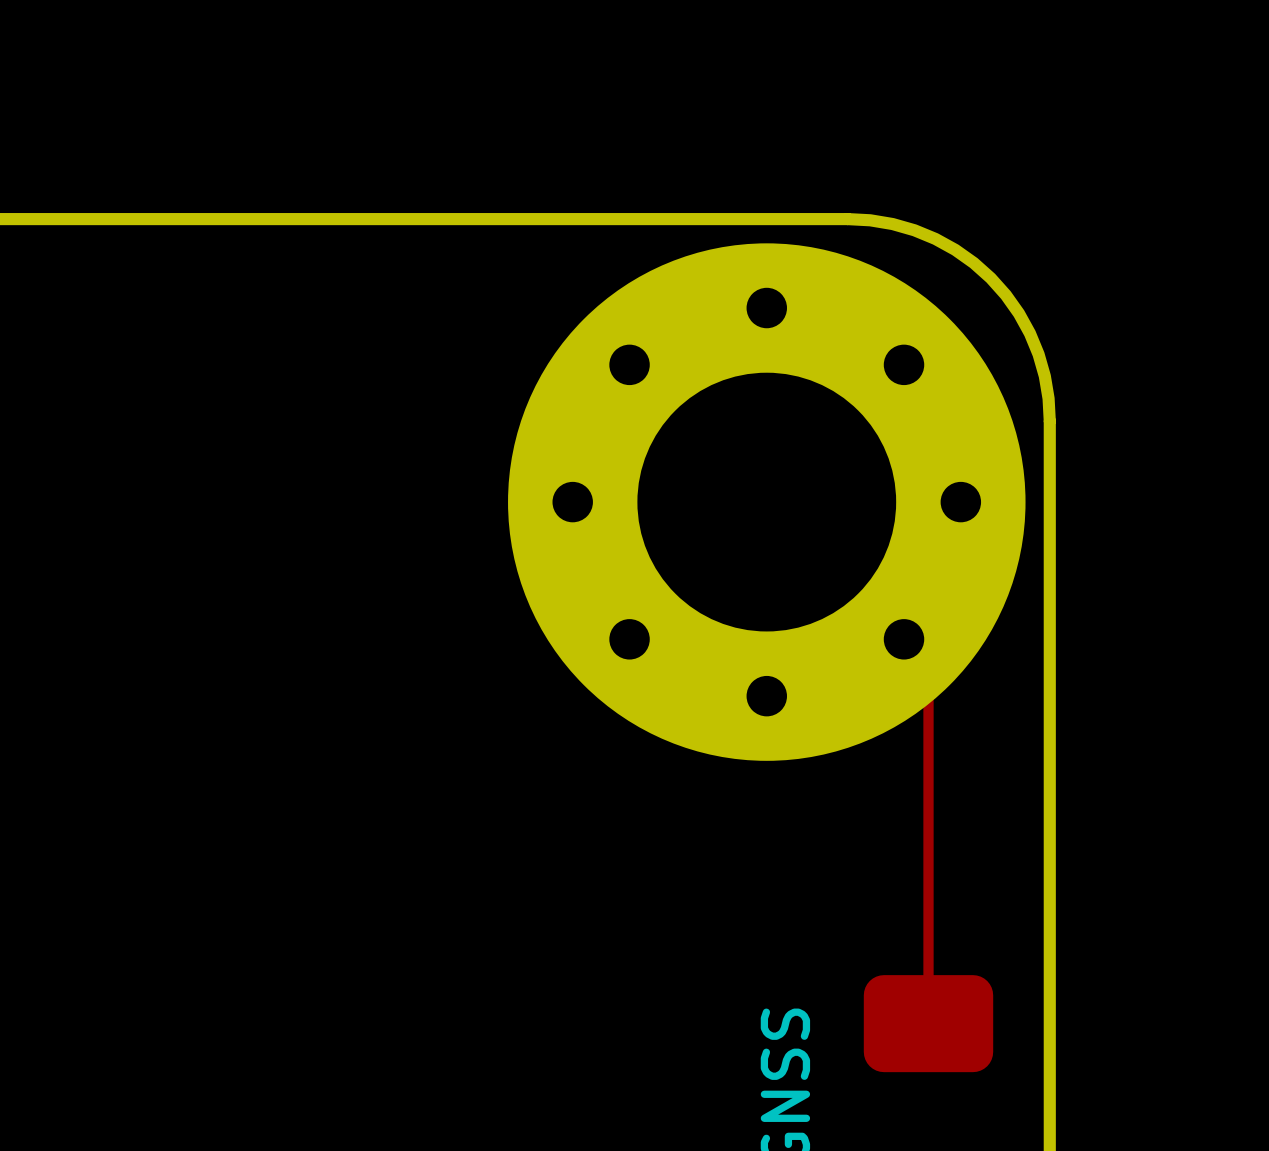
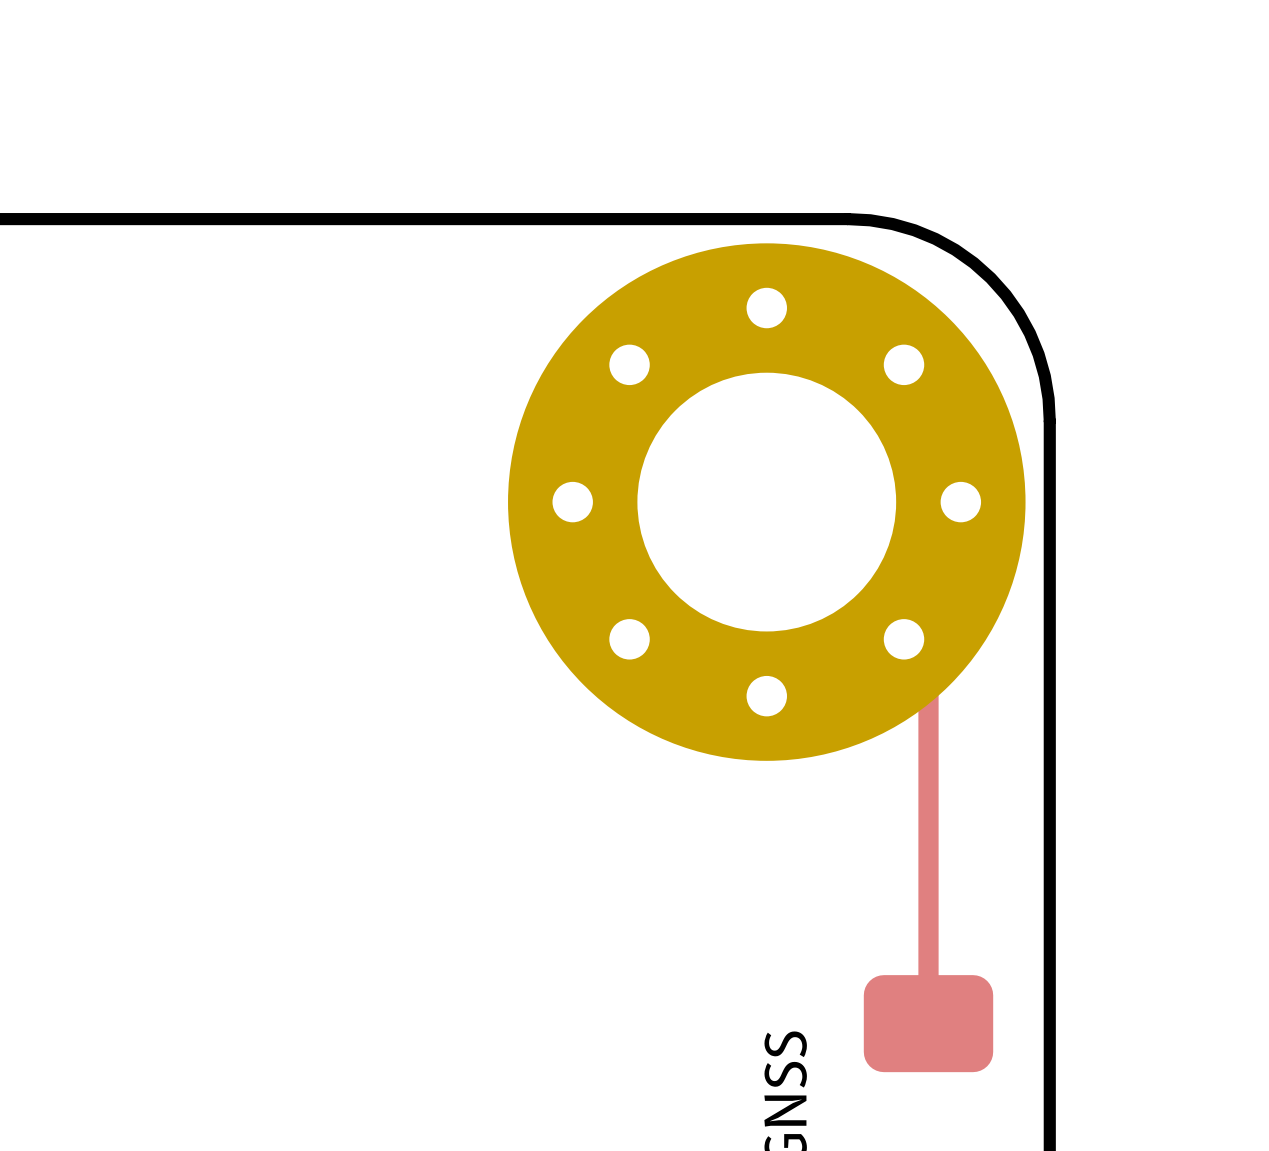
track width: thin (904, 639) (928, 663) (928, 1027) -> thick (904, 639) (928, 663) (928, 1027)

